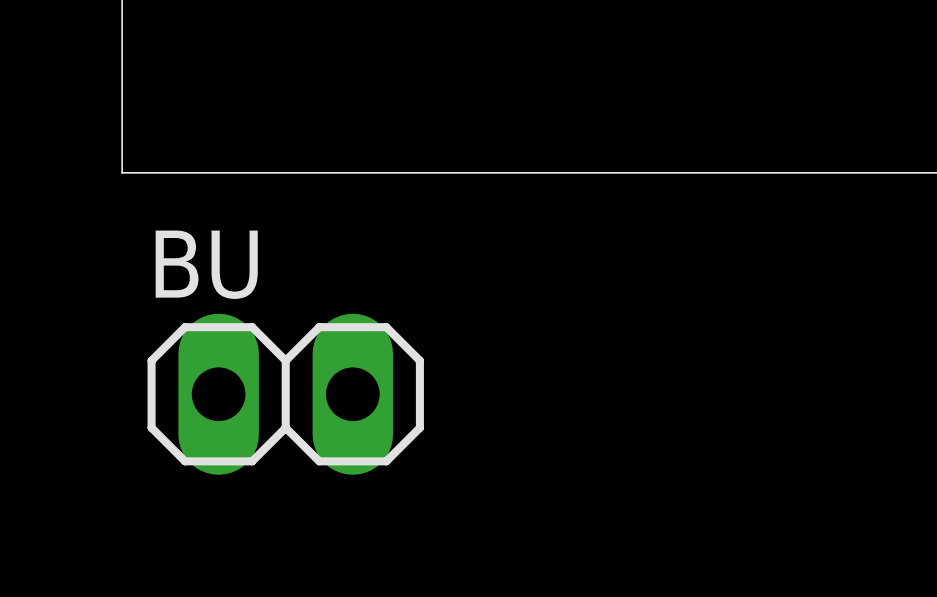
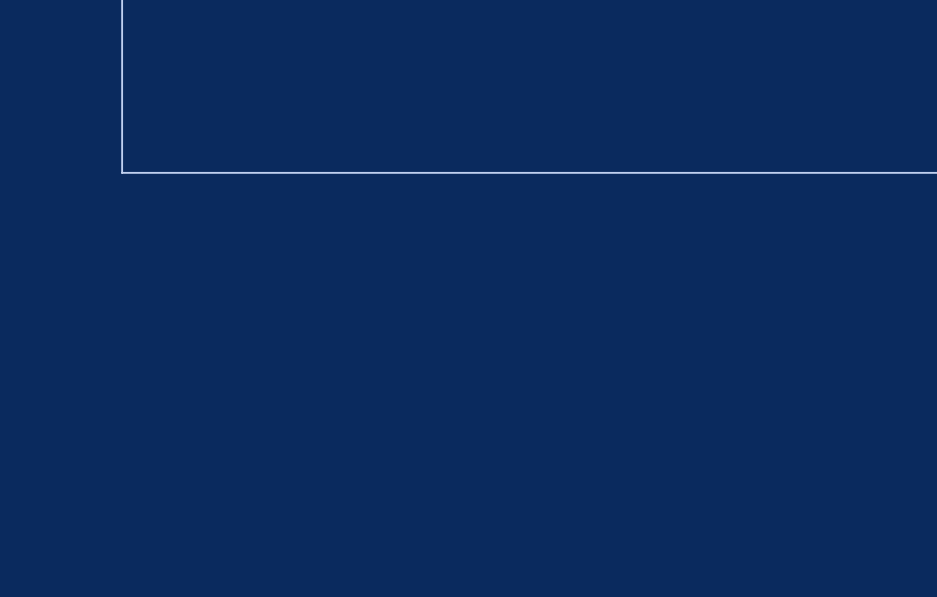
BU: (285, 394) -> none

